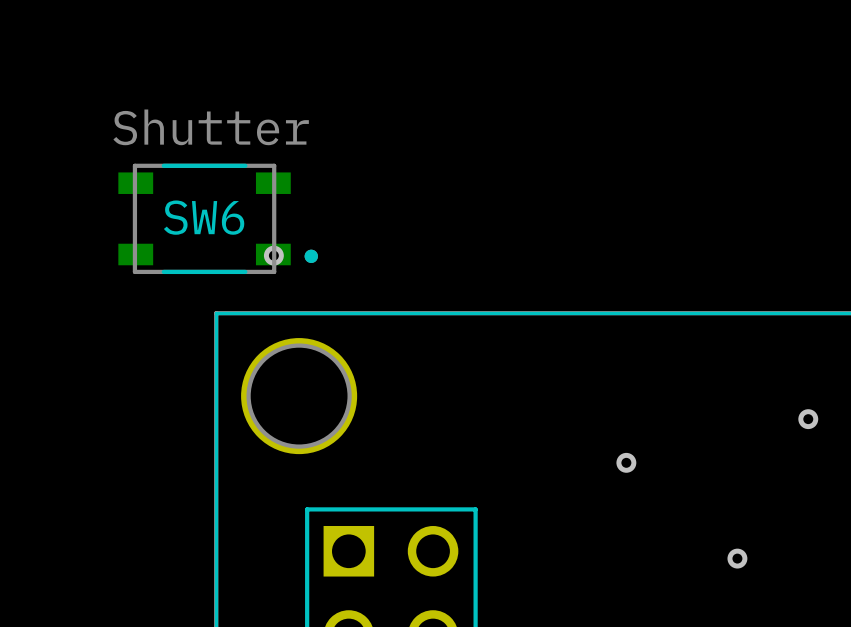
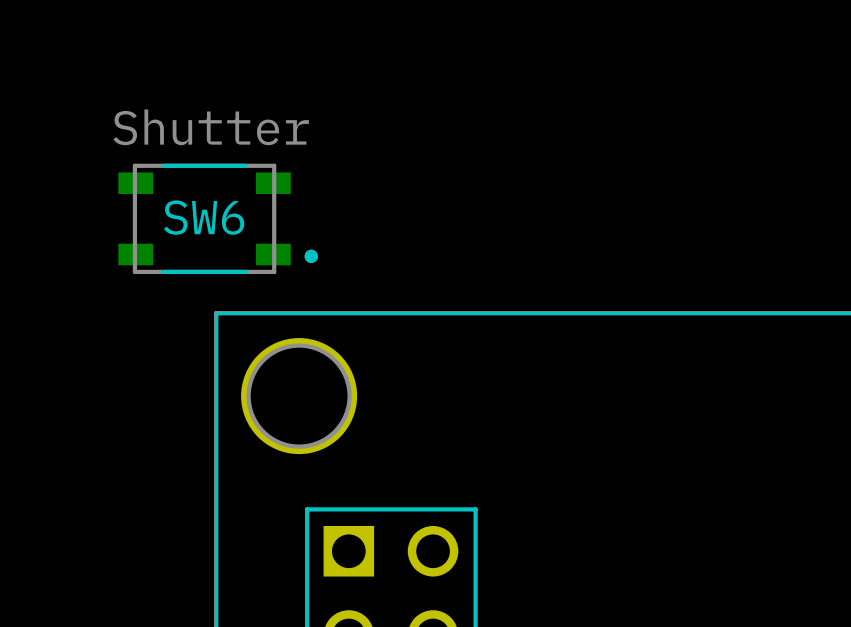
via: (273, 255) -> none
via: (808, 419) -> none
via: (626, 462) -> none
via: (737, 558) -> none

